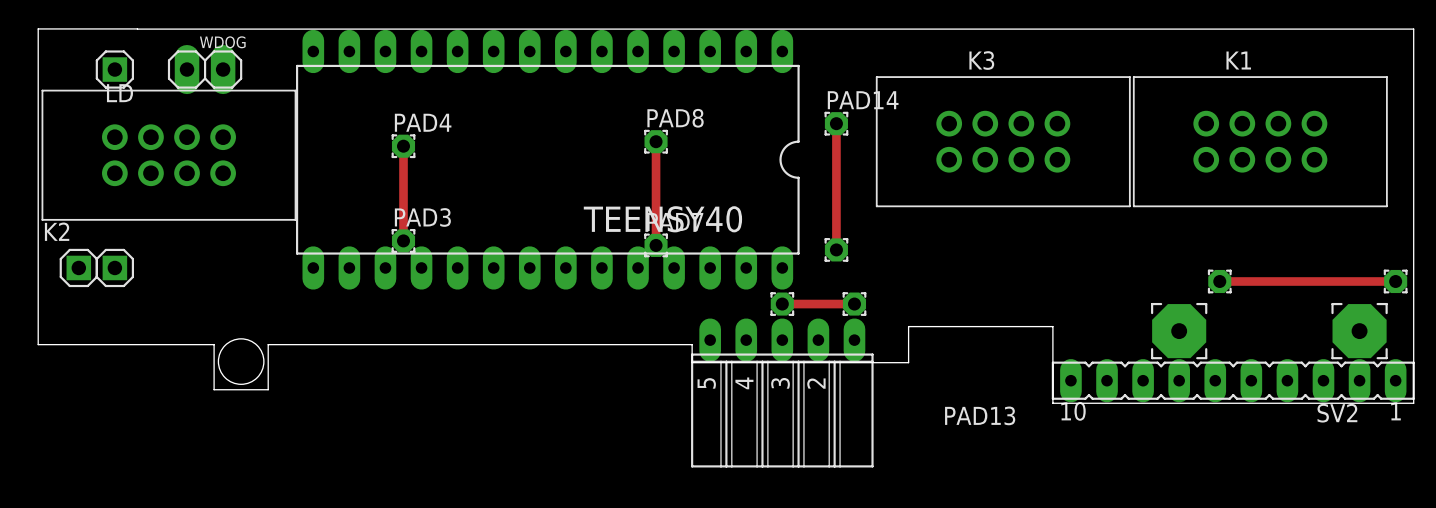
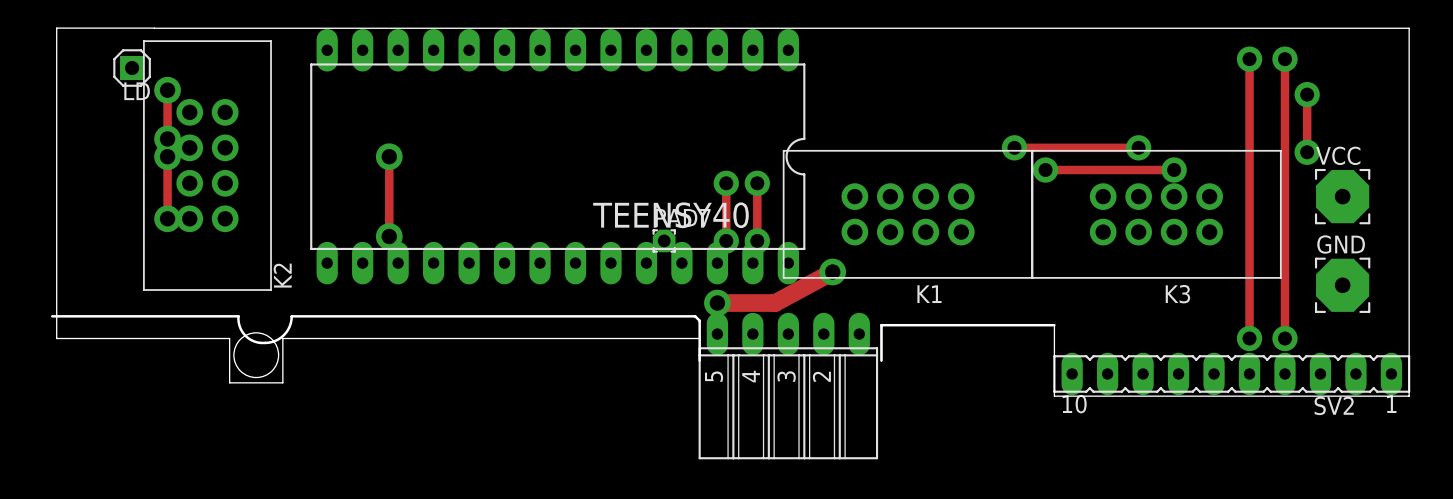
K3 name position: K3 (981, 60) -> K3 (1177, 294)
K1 name position: K1 (1238, 60) -> K1 (929, 294)
track: none -> (1249, 59) (1249, 338)
via: none -> (1249, 59)
track: none -> (1284, 59) (1284, 338)
via: none -> (1284, 59)
WDOG: (205, 69) -> none
K3 footprint: [875, 76, 1131, 208] -> [1031, 149, 1282, 279]
K1 footprint: [1132, 76, 1388, 208] -> [782, 149, 1034, 279]
K2 footprint: [41, 89, 297, 221] -> [143, 40, 272, 291]
track: none -> (167, 90) (167, 138)
via: none -> (167, 90)
track: none -> (1307, 94) (1307, 152)
via: none -> (1307, 94)
track: (836, 123) (836, 249) -> none
PAD14: (836, 123) -> none
via: none -> (167, 138)
track: (656, 141) (656, 245) -> none
PAD8: (656, 141) -> none
track: (403, 146) (403, 240) -> none
PAD4: (403, 146) -> none
track: none -> (1014, 147) (1138, 147)
via: none -> (1014, 147)
via: none -> (1138, 147)
via: none -> (1307, 152)
track: none -> (167, 156) (167, 218)
via: none -> (167, 156)
track: none -> (389, 156) (389, 236)
via: none -> (389, 156)
track: none -> (1045, 170) (1174, 170)
via: none -> (1045, 170)
via: none -> (1174, 170)
track: none -> (726, 183) (726, 240)
via: none -> (726, 183)
track: none -> (757, 183) (757, 240)
via: none -> (757, 183)
VCC: none -> (1342, 196)
via: none -> (167, 218)
K2 name position: K2 (57, 231) -> K2 (282, 275)
via: none -> (389, 236)
PAD3: (403, 240) -> none
via: none -> (726, 240)
via: none -> (757, 240)
PAD13: (836, 249) -> none
part: (78, 267) -> none
part: (114, 267) -> none
track: none -> (832, 271) (775, 303) (717, 303)
via: none -> (832, 271)
track: (1219, 281) (1395, 281) -> none
part: (1219, 281) -> none
part: (1395, 281) -> none
GND: none -> (1342, 285)
track: (782, 304) (854, 304) -> none
part: (782, 304) -> none
part: (854, 304) -> none
via: none -> (717, 303)
board edge: none -> (238, 316) (52, 316) (238, 316)
board edge: none -> (238, 316) (240, 328) (246, 336) (254, 341) (265, 342)
board edge: none -> (291, 316) (695, 316) (699, 320) (699, 360)
board edge: none -> (291, 316) (289, 326) (283, 335) (275, 340) (265, 342)
board edge: none -> (881, 325) (1054, 325) (881, 325)
board edge: none -> (881, 325) (881, 360) (881, 325)
board edge: (1052, 331) (1052, 326) (908, 326) (908, 362) (692, 362) -> none
part: (1179, 331) -> none
part: (1359, 331) -> none
via: none -> (1249, 338)
via: none -> (1284, 338)

